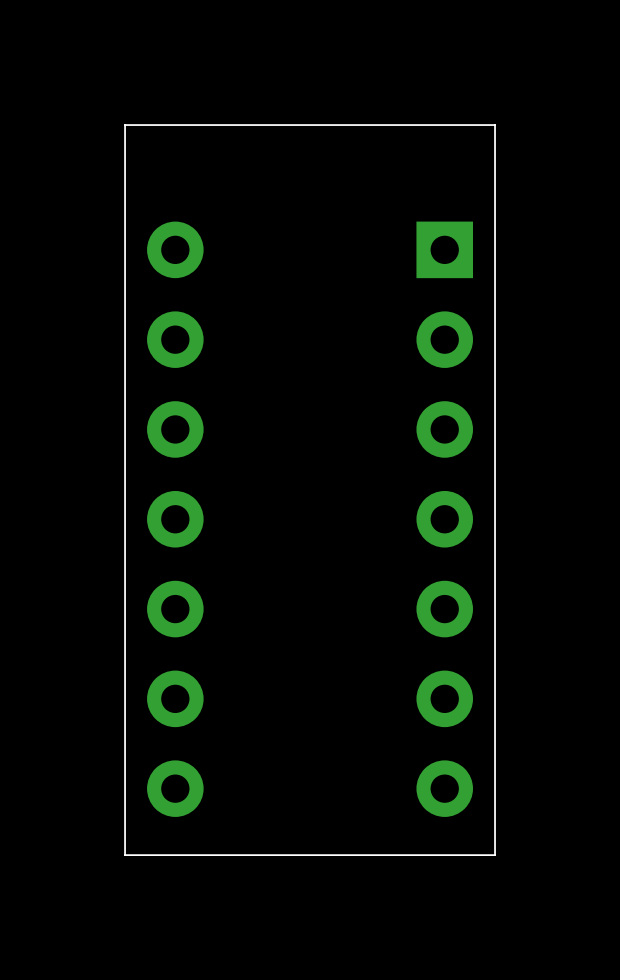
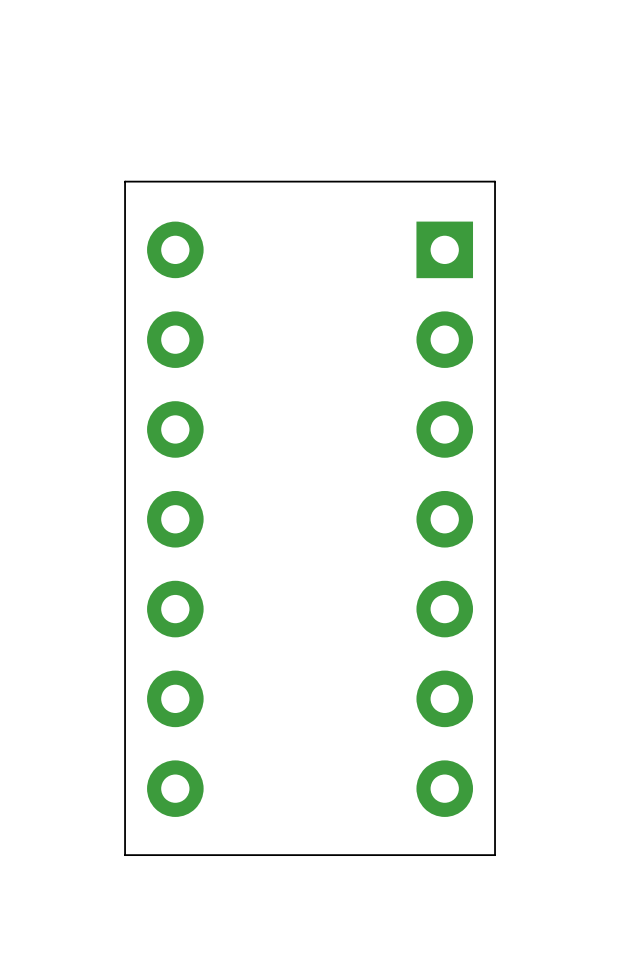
board edge: (495, 181) (495, 125) (125, 125) (125, 181) -> (495, 181) (125, 181)

